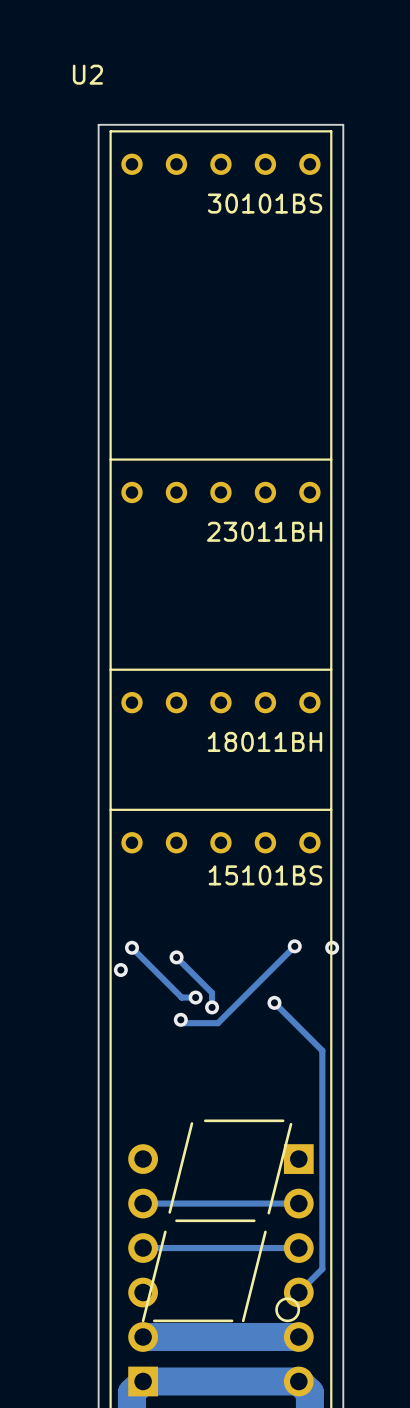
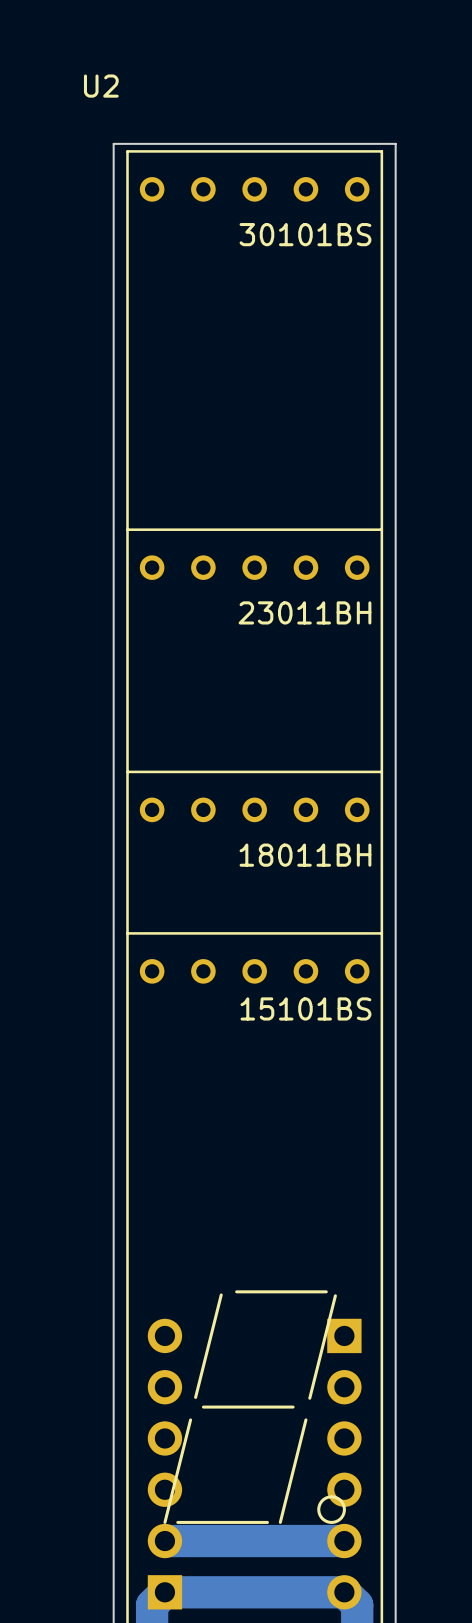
track: (294, 946) (217, 1023) (184, 1023) (180, 1019) -> none
via: (294, 946) -> none
track: (131, 947) (181, 997) (195, 997) -> none
via: (131, 947) -> none
via: (332, 947) -> none
track: (176, 957) (212, 992) (212, 1007) -> none
via: (176, 957) -> none
via: (120, 970) -> none
via: (195, 997) -> none
track: (274, 1002) (322, 1050) (322, 1268) (298, 1292) -> none
via: (274, 1002) -> none
via: (212, 1007) -> none
via: (180, 1019) -> none
track: (298, 1203) (143, 1203) -> none
track: (298, 1248) (143, 1248) -> none

